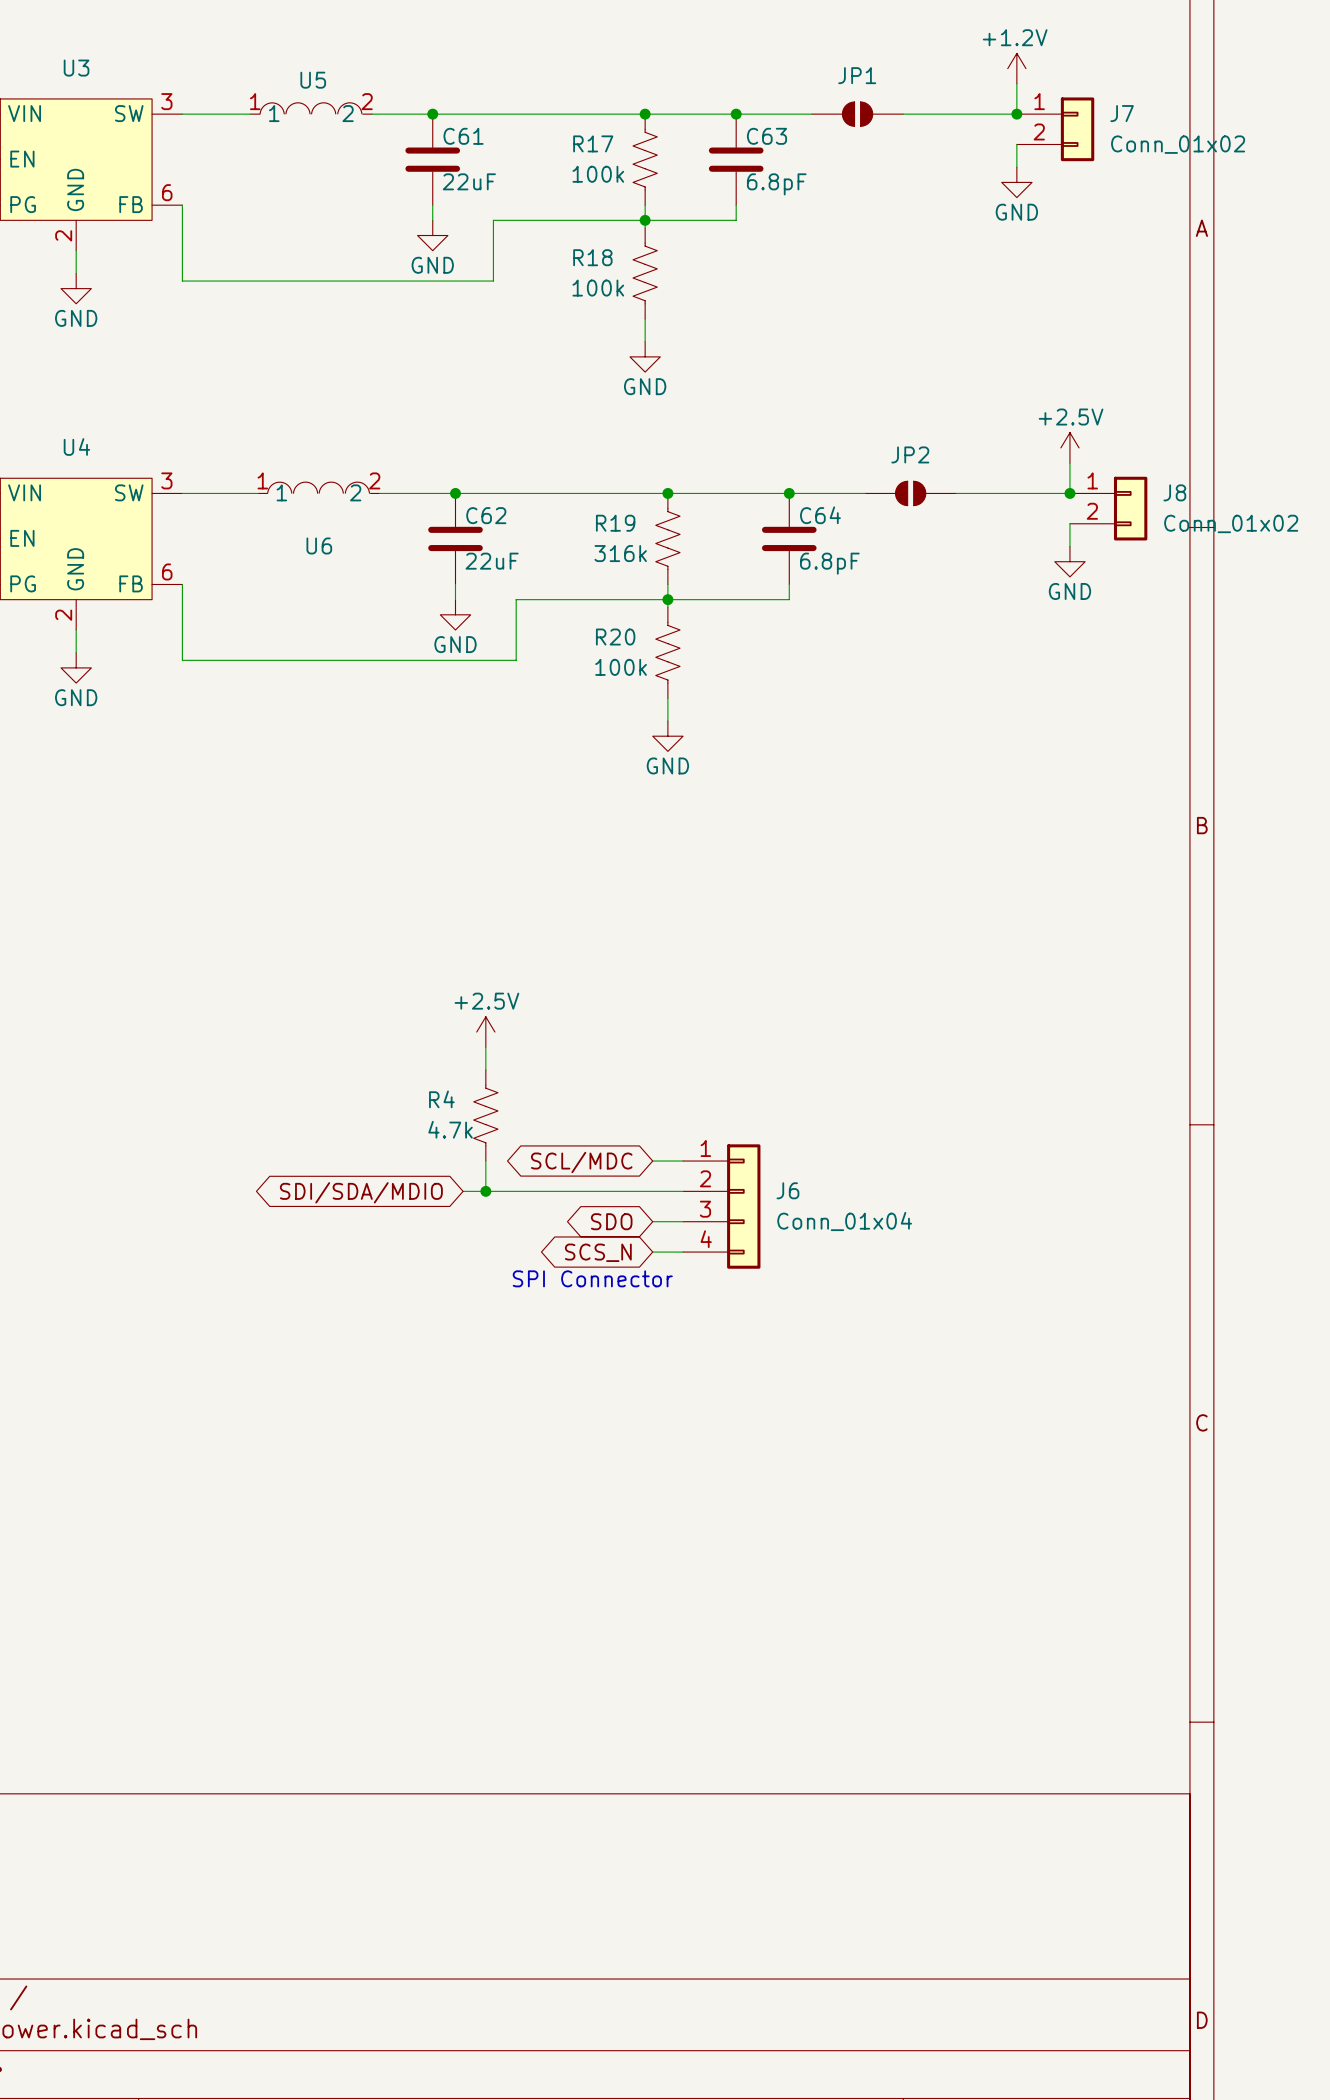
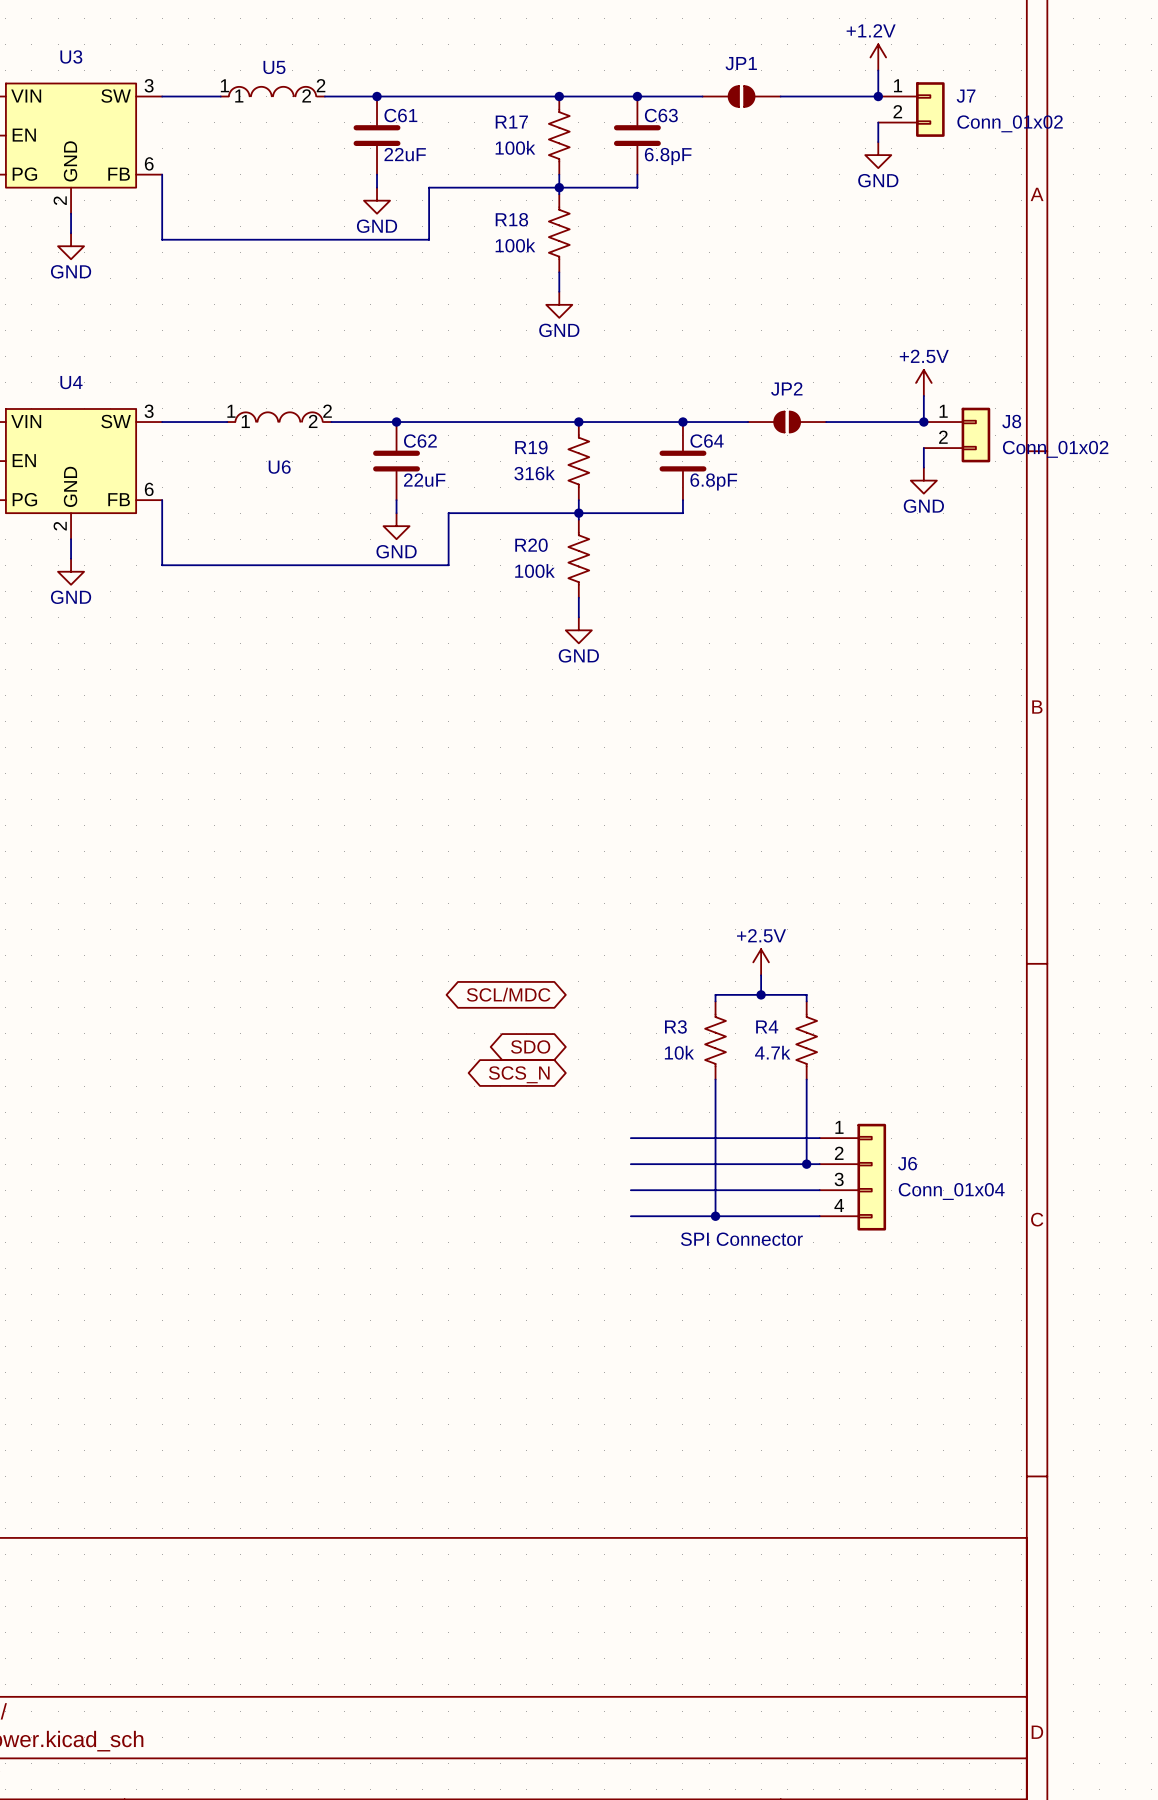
power symbol: +2.5V (485, 1032) -> none
wire: (485, 1047) (485, 1069) -> none
R4 position: (485, 1115) -> (806, 1040)
power symbol: none -> +2.5V (761, 962)
wire: none -> (761, 975) (761, 994)
wire: (485, 1161) (485, 1191) -> none
wire: (652, 1161) (683, 1161) -> none
junction: none -> (761, 994)
wire: none -> (715, 1001) (715, 994) (806, 994) (806, 1001)
wire: (463, 1191) (683, 1191) -> (630, 1138) (819, 1138)
junction: (485, 1191) -> none
global label: SDI/SDA/MDIO (361, 1192) -> none
J6 position: (721, 1206) -> (852, 1177)
R3: none -> 10k (715, 1040)
wire: (652, 1221) (683, 1221) -> none
wire: (652, 1252) (683, 1252) -> none
wire: none -> (715, 1079) (715, 1216)
wire: none -> (806, 1079) (806, 1164)
text: SPI Connector (592, 1278) -> none
wire: none -> (630, 1164) (819, 1164)
junction: none -> (806, 1164)
wire: none -> (630, 1190) (819, 1190)
wire: none -> (630, 1216) (819, 1216)
junction: none -> (715, 1216)
text: none -> SPI Connector (741, 1239)

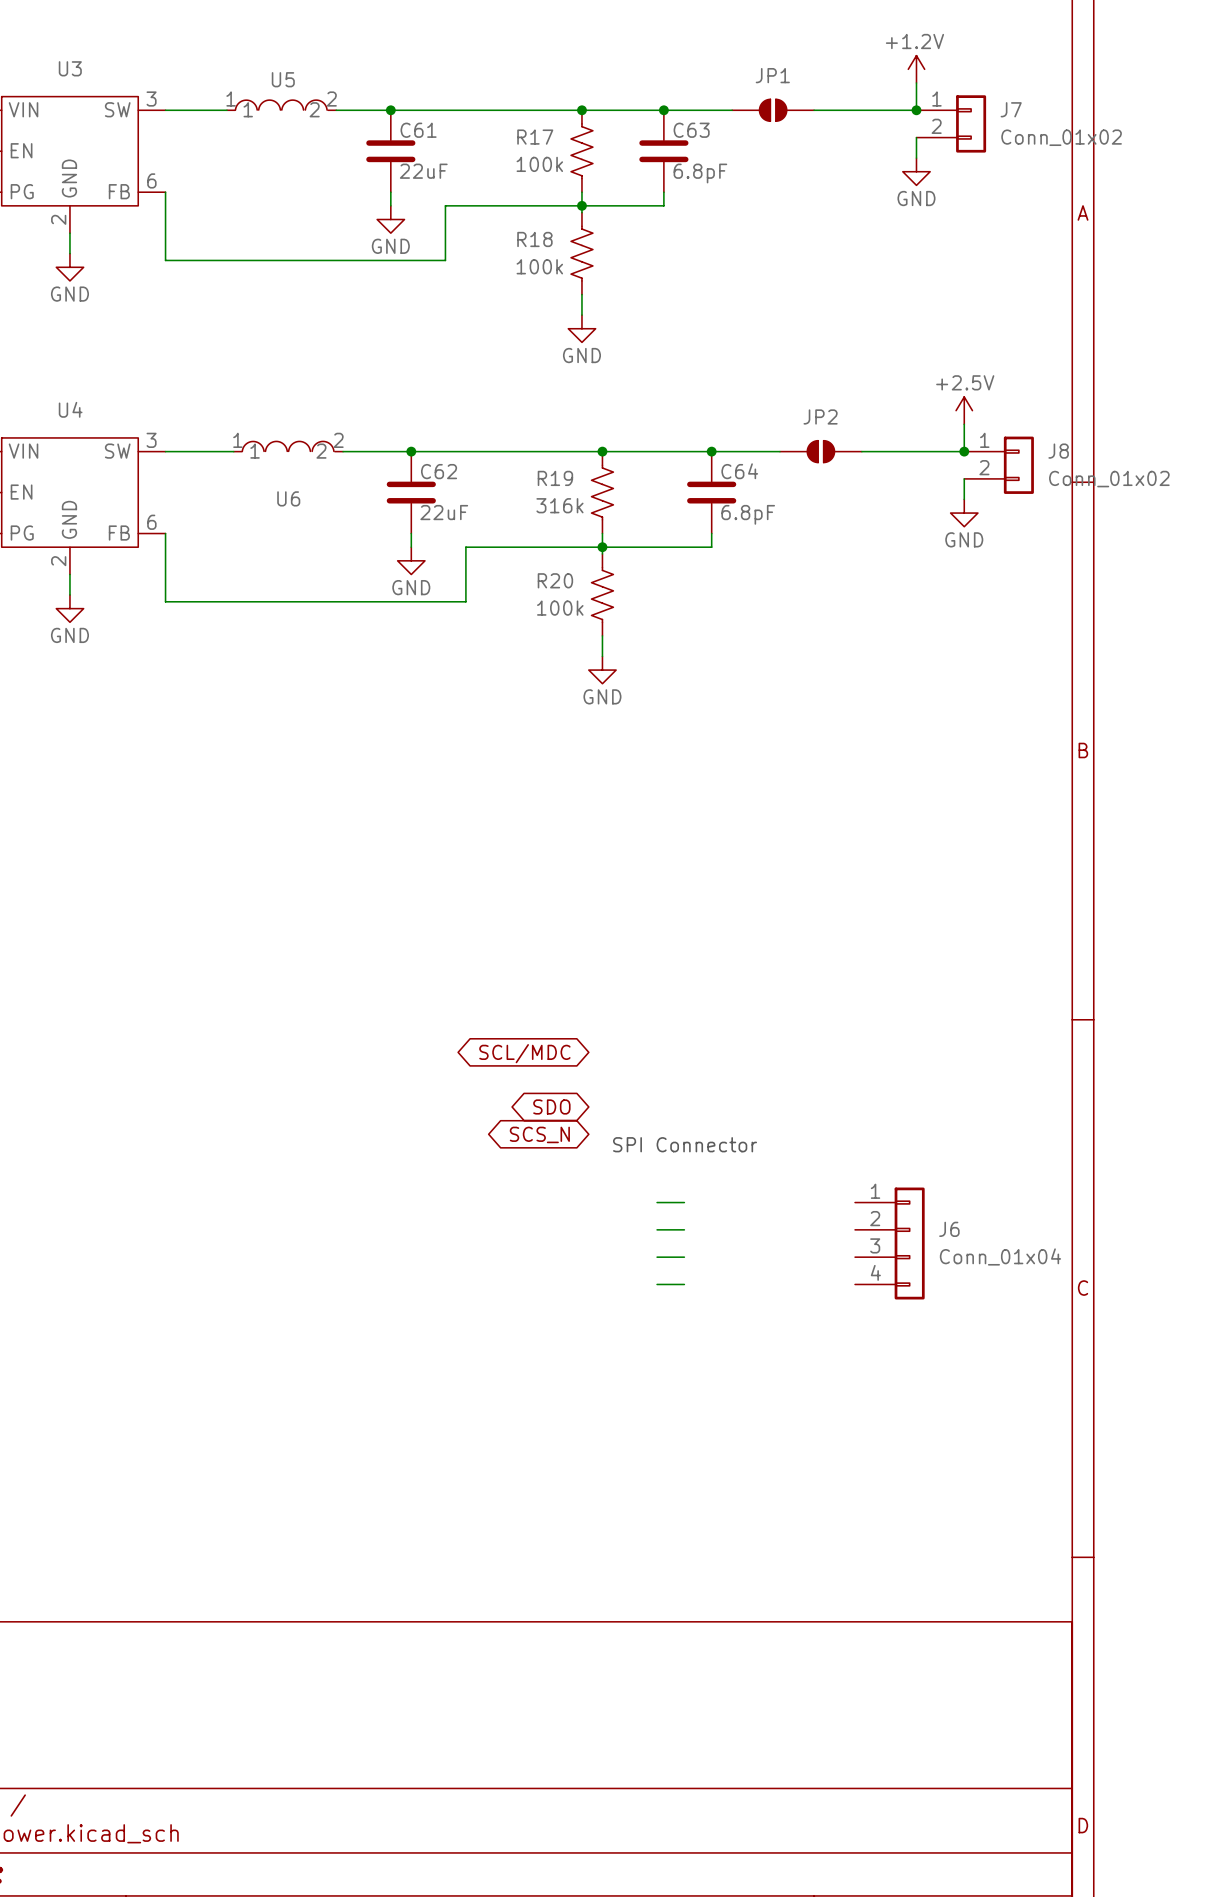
power symbol: +2.5V (761, 962) -> none
wire: (761, 975) (761, 994) -> none
junction: (761, 994) -> none
wire: (715, 1001) (715, 994) (806, 994) (806, 1001) -> none
R3: 10k (715, 1040) -> none
R4: 4.7k (806, 1040) -> none
wire: (715, 1079) (715, 1216) -> none
wire: (806, 1079) (806, 1164) -> none
wire: (656, 1138) (819, 1138) -> none
wire: (656, 1164) (819, 1164) -> none
junction: (806, 1164) -> none
wire: (656, 1190) (819, 1190) -> none
wire: (656, 1216) (819, 1216) -> none
junction: (715, 1216) -> none
text position: SPI Connector (741, 1239) -> SPI Connector (685, 1144)

